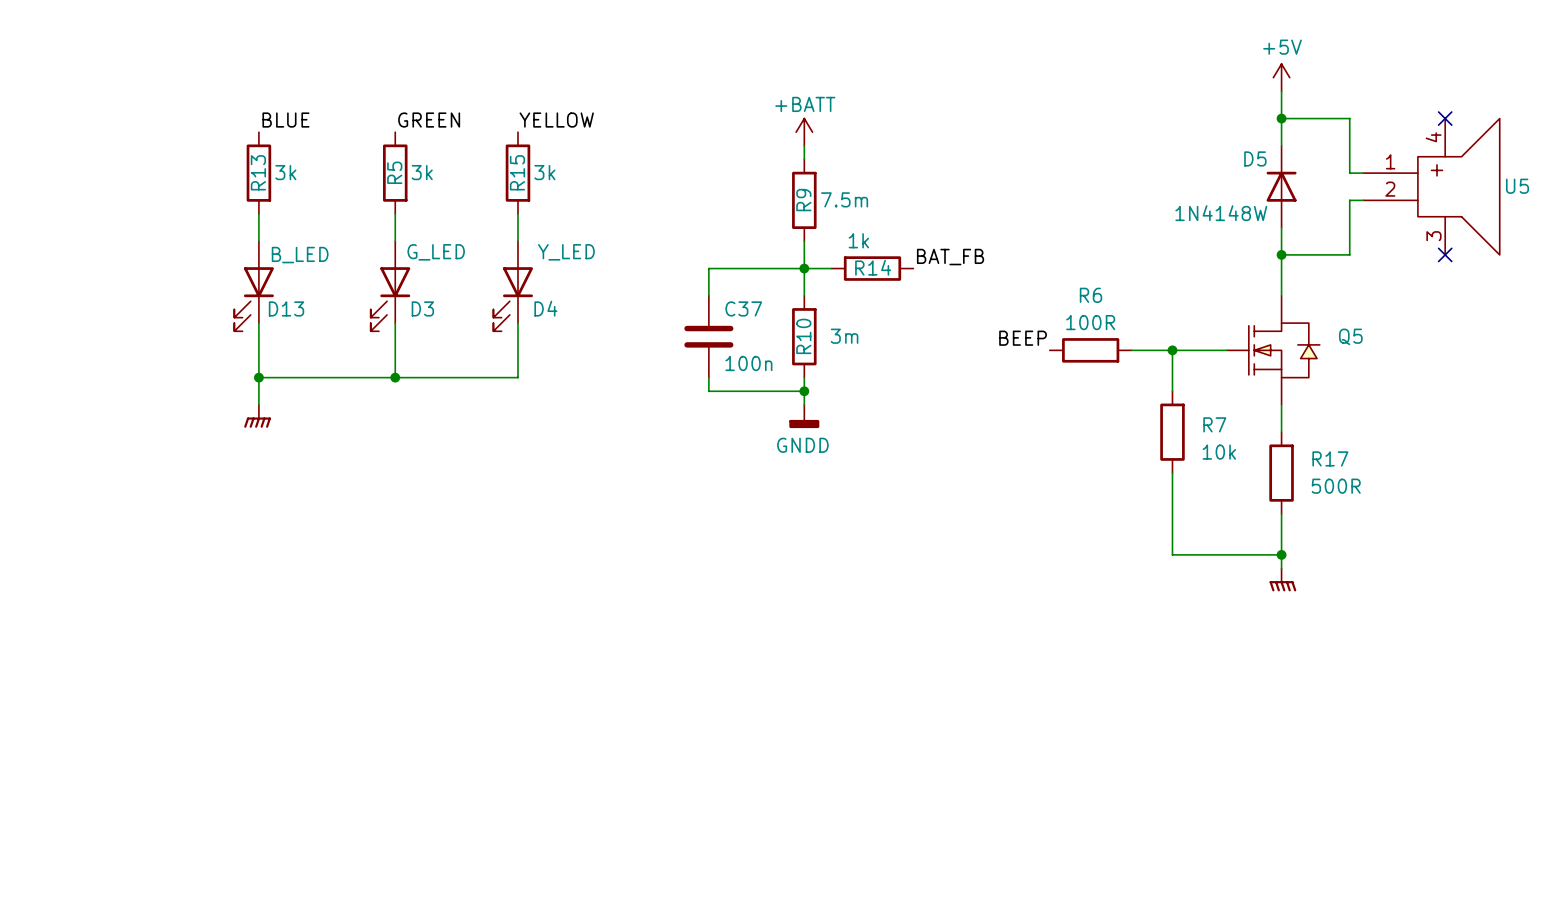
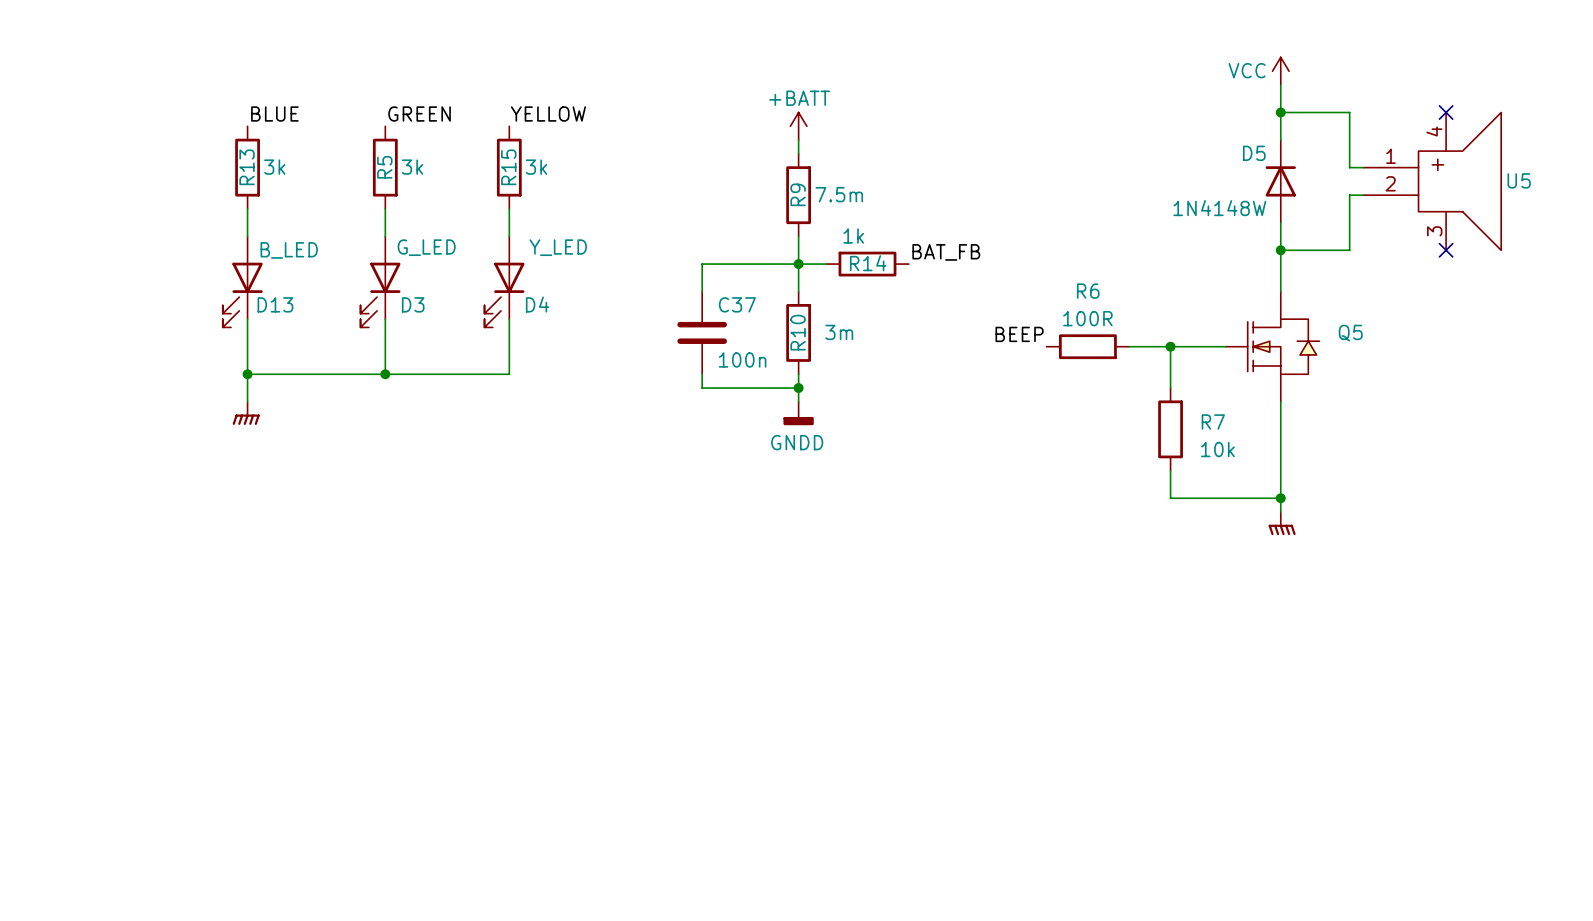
power symbol: +5V (1281, 77) -> VCC (1280, 71)
R17: 500R (1281, 473) -> none
wire: (1172, 500) (1172, 554) (1281, 554) -> (1170, 498) (1280, 498)
wire: (1281, 513) (1281, 568) -> (1280, 512) (1280, 429)
junction position: (1281, 554) -> (1280, 498)
power symbol position: (1282, 579) -> (1282, 523)

